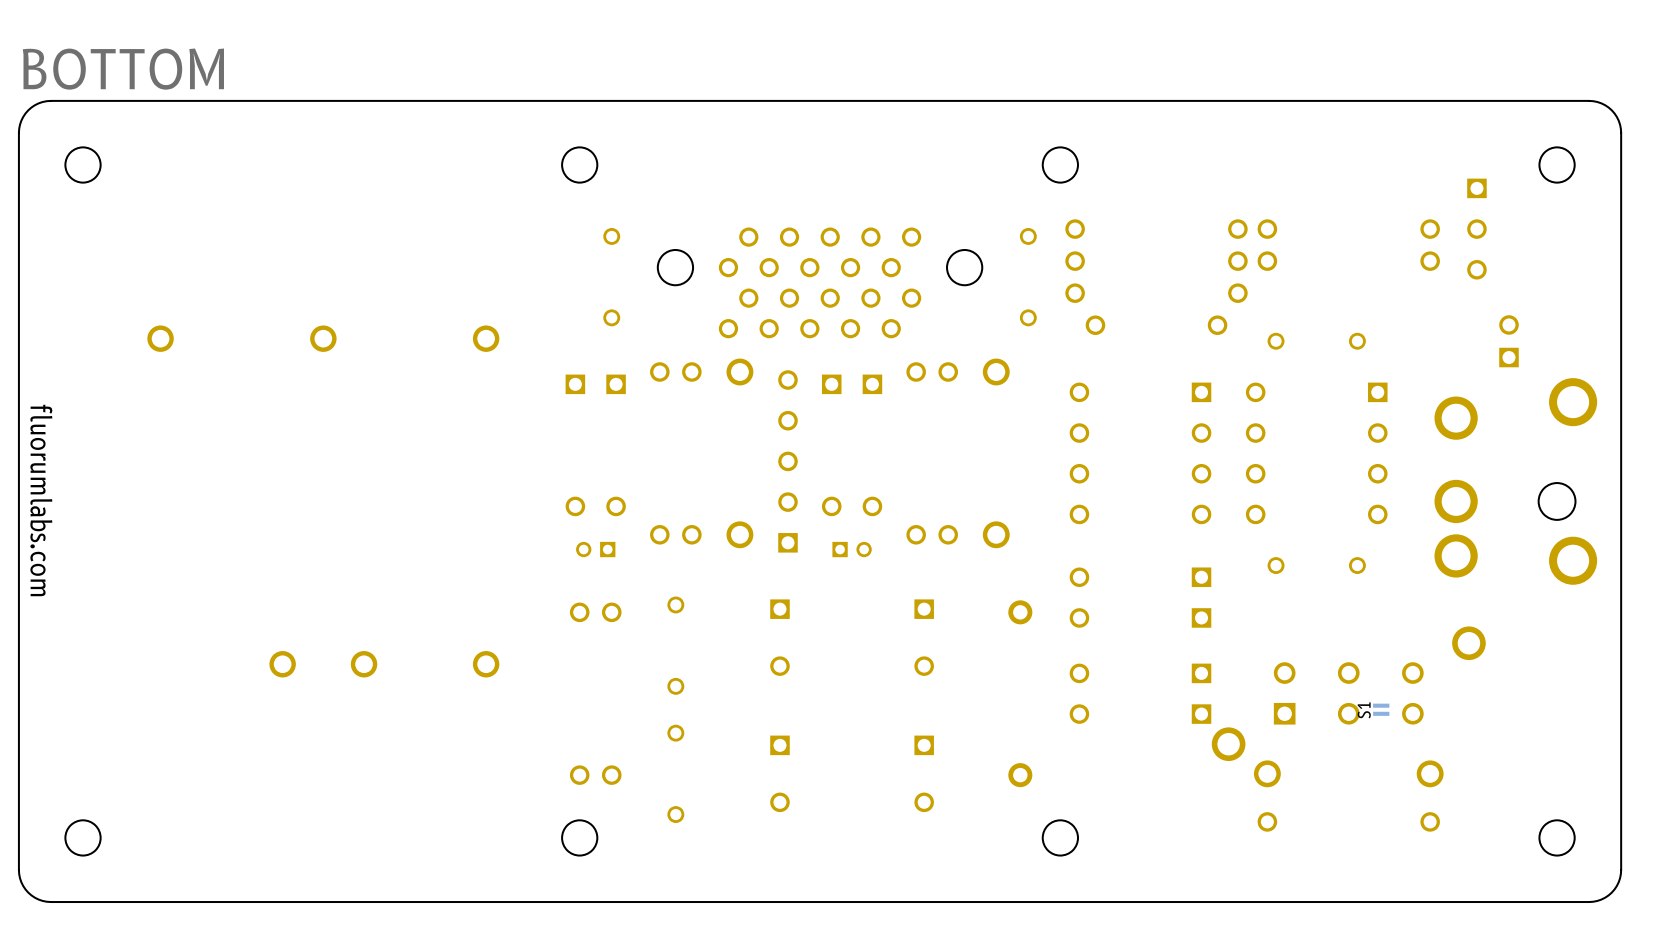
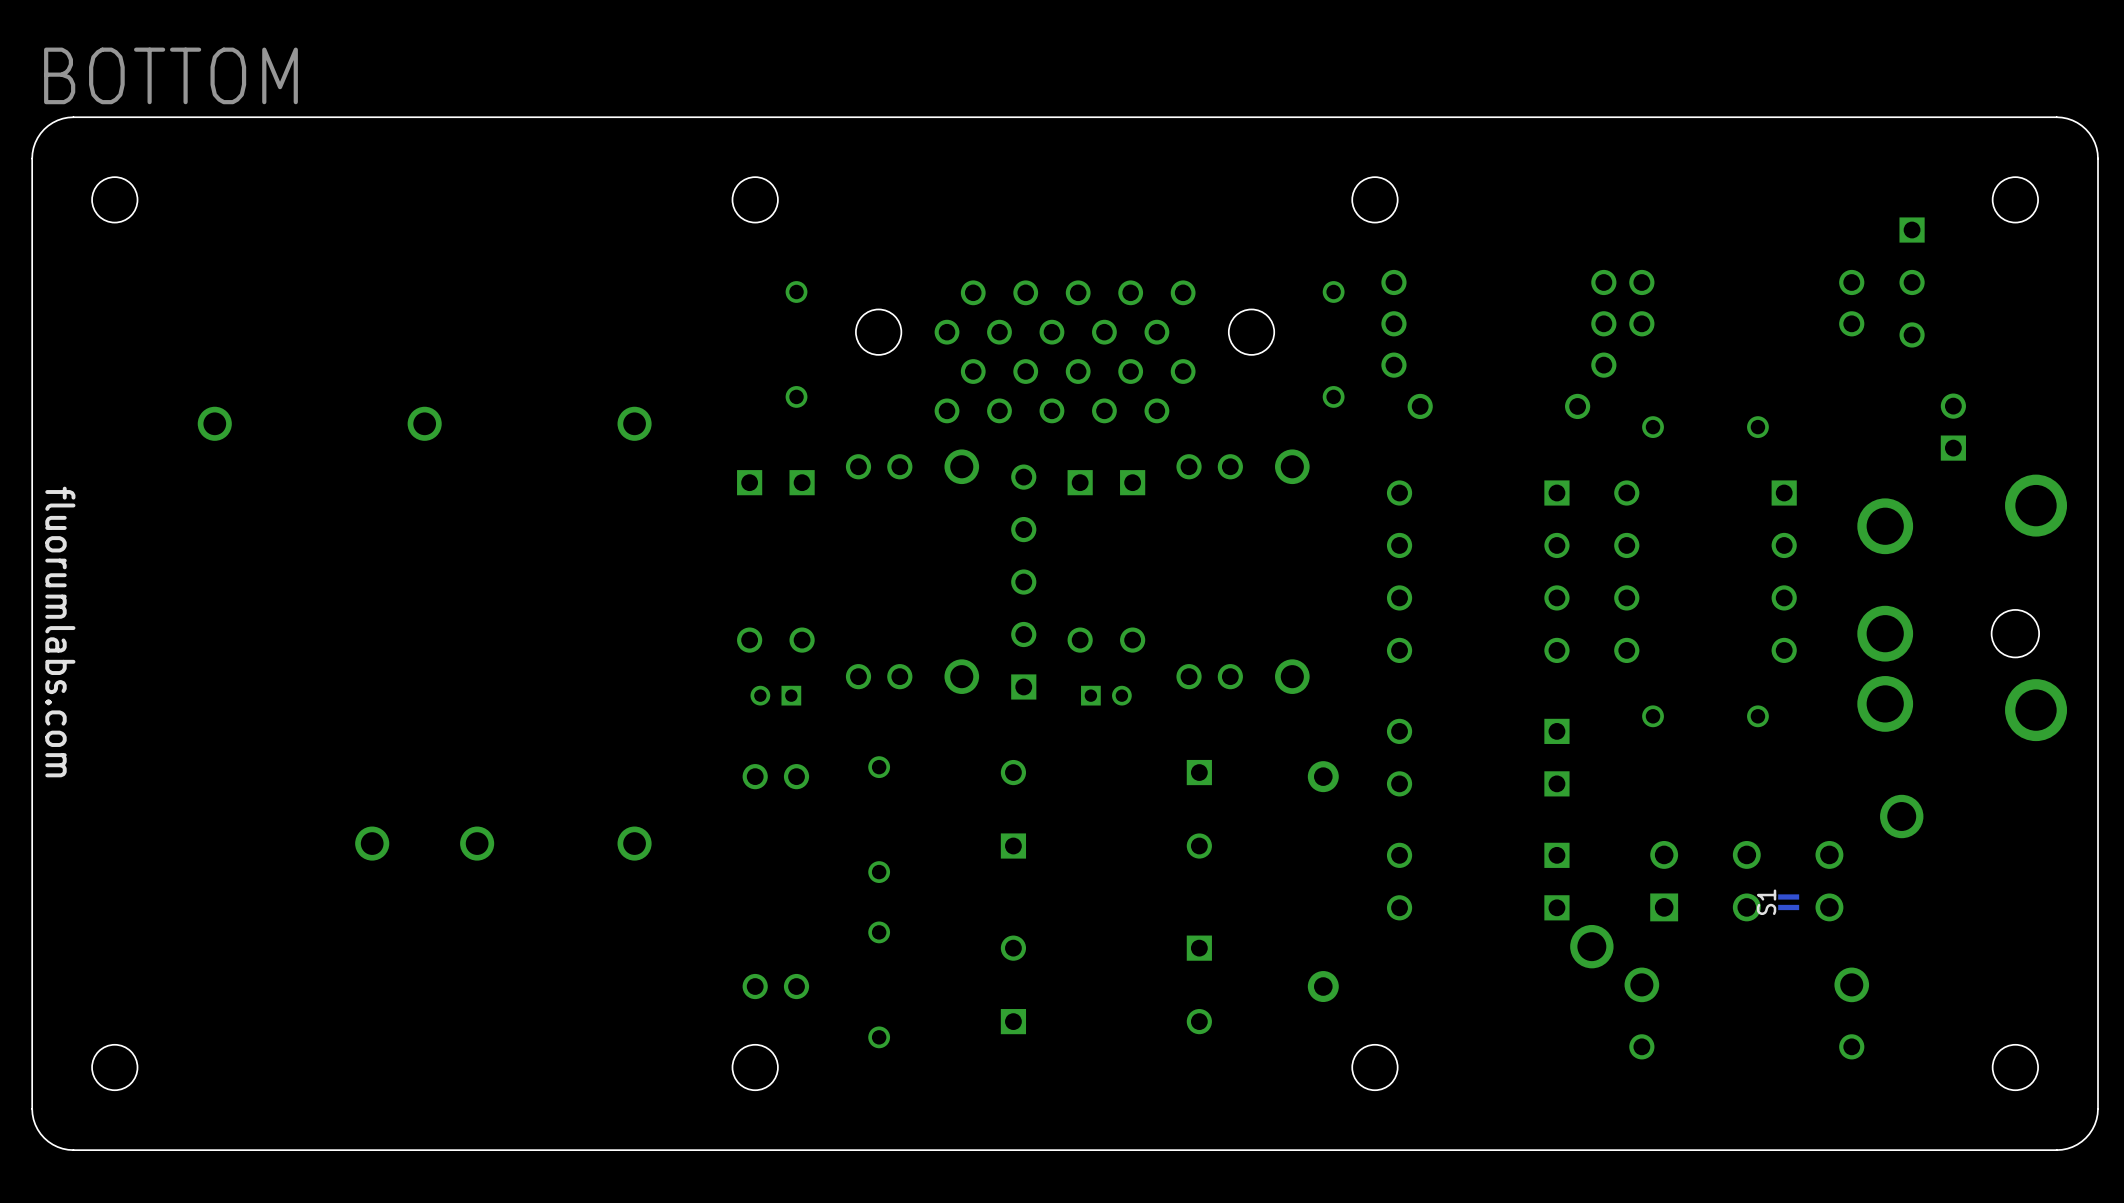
part rotation: 0° (779, 637) -> 180° (1013, 809)
part rotation: 0° (779, 773) -> 180° (1013, 984)

